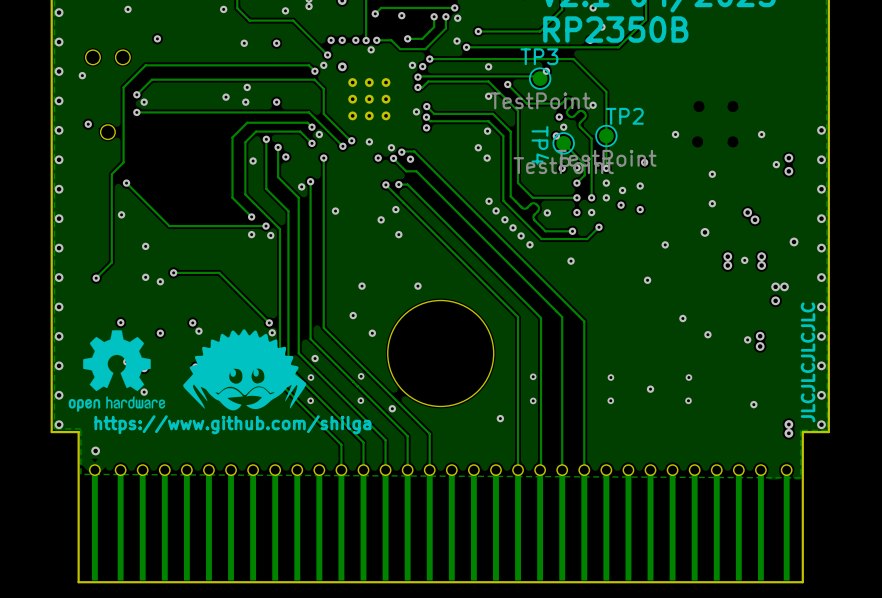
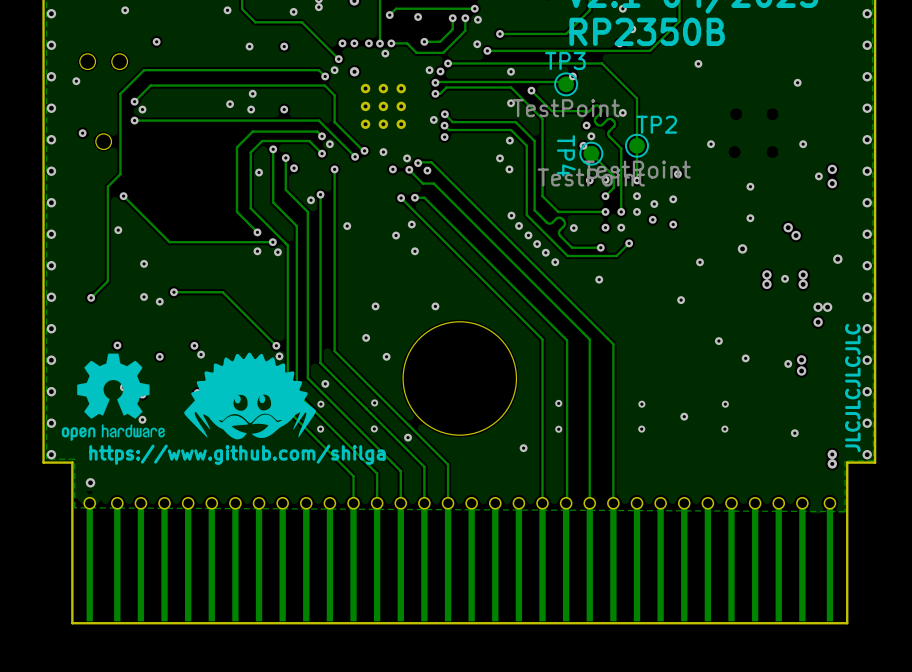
via: none -> (867, 13)
via: none -> (867, 45)
via: none -> (698, 63)
via: none -> (867, 76)
via: none -> (797, 82)
via: none -> (867, 108)

